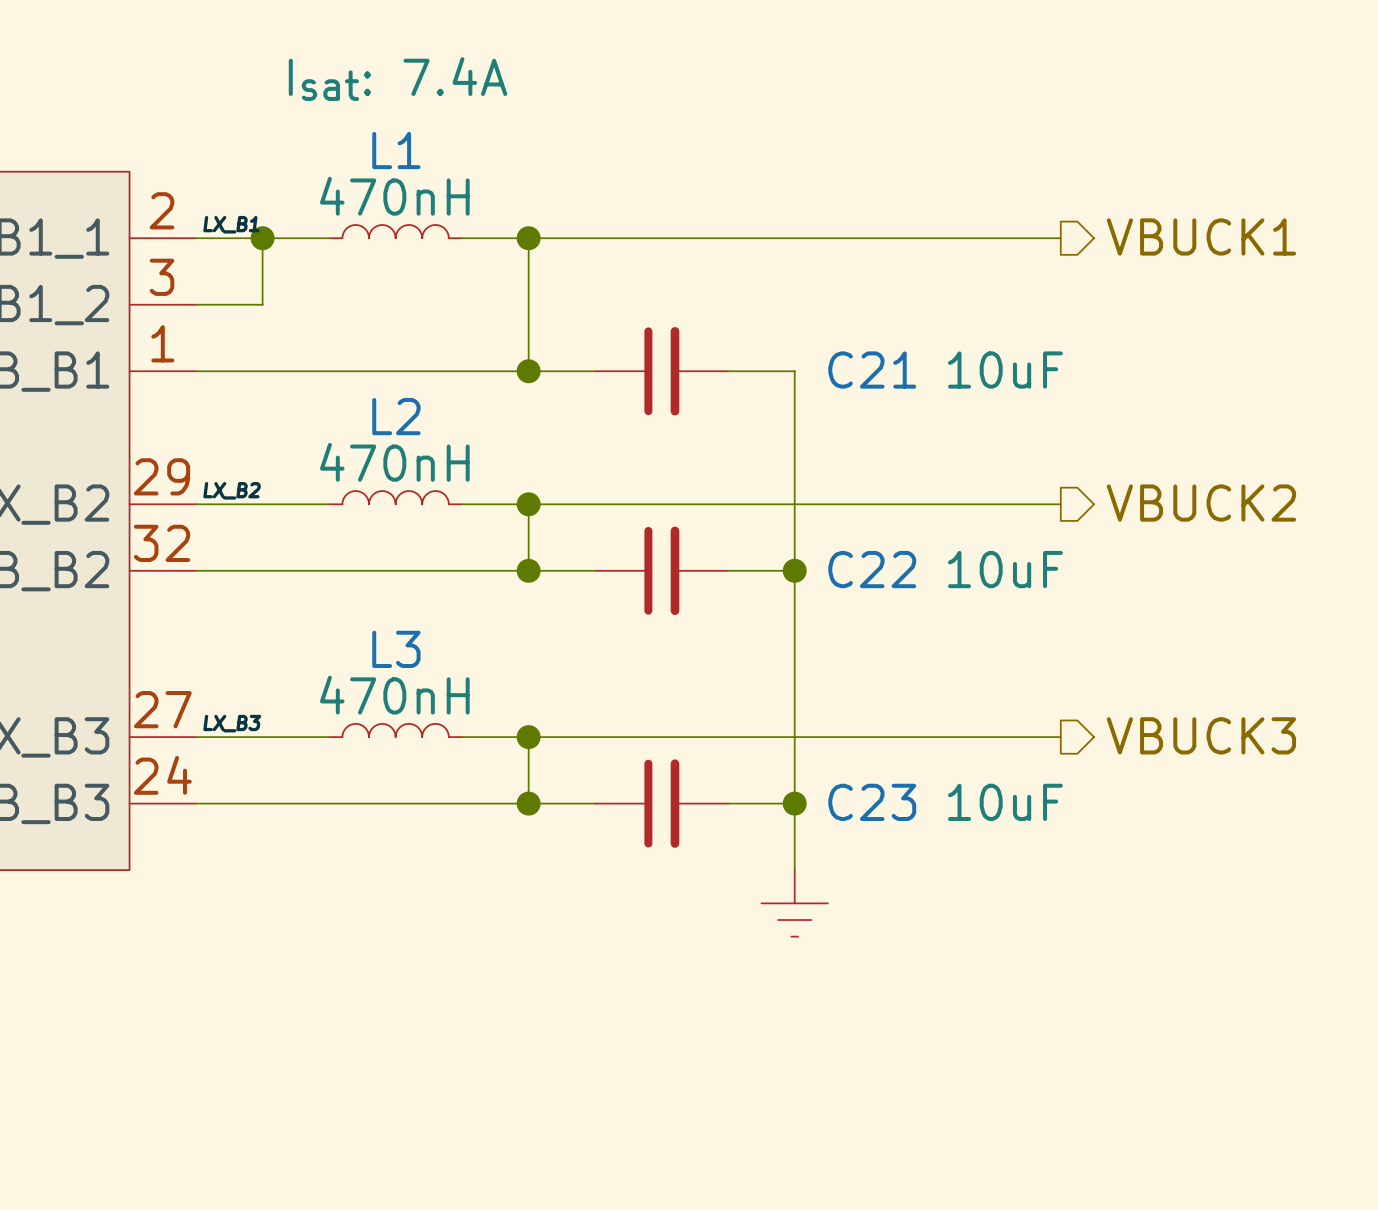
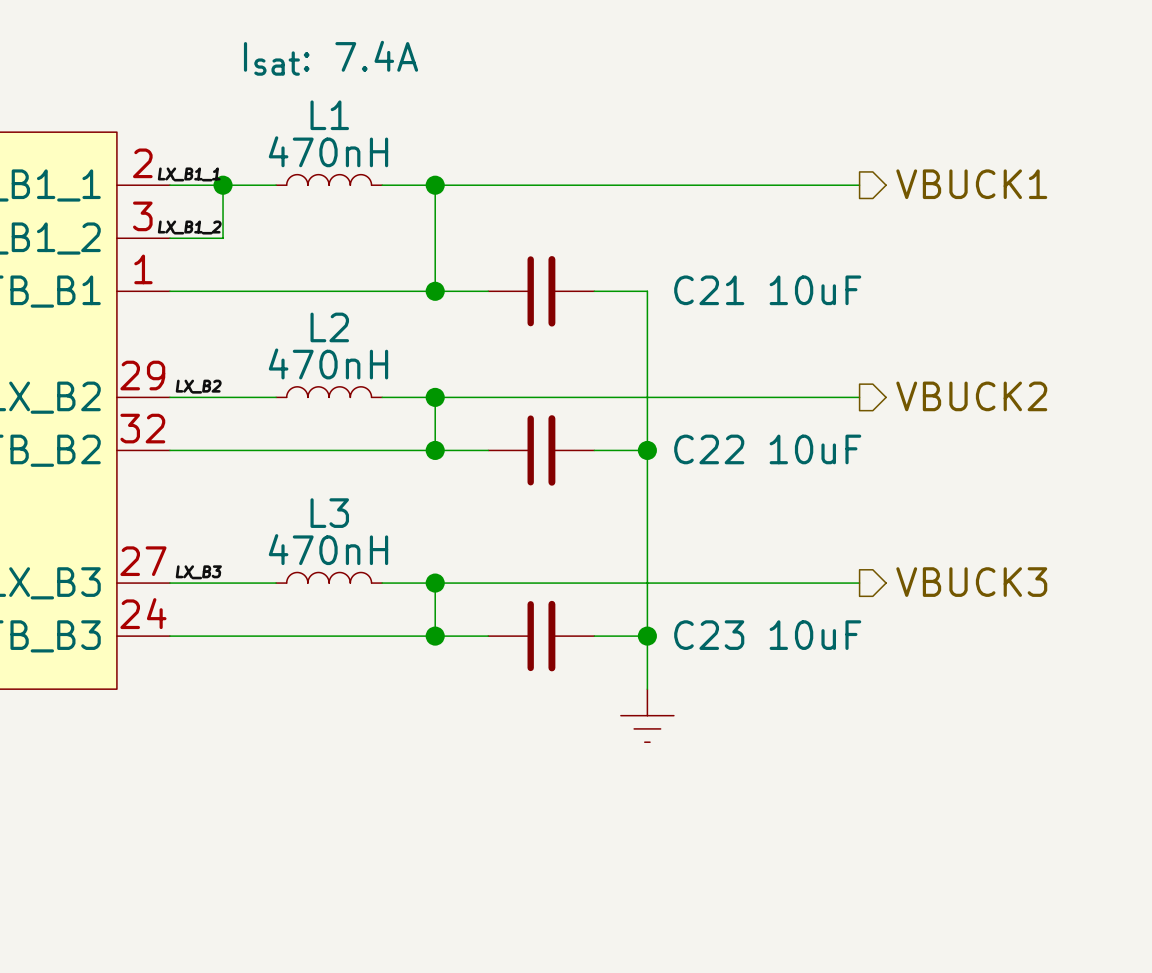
label: LX_B1 (231, 224) -> LX_B1_1 (189, 174)
label: none -> LX_B1_2 (189, 227)

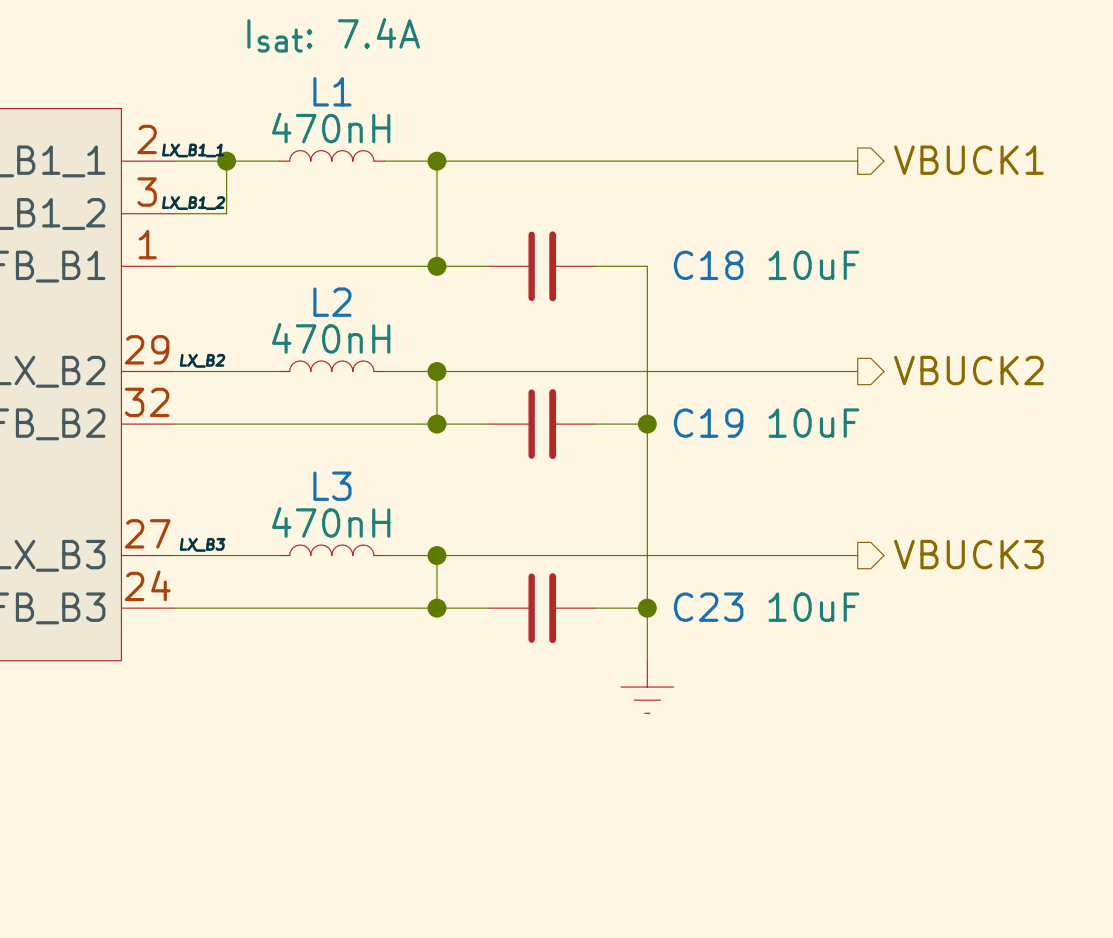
C21 name: C21 (709, 290) -> C18 (708, 265)
C22 name: C22 (709, 449) -> C19 (708, 423)

